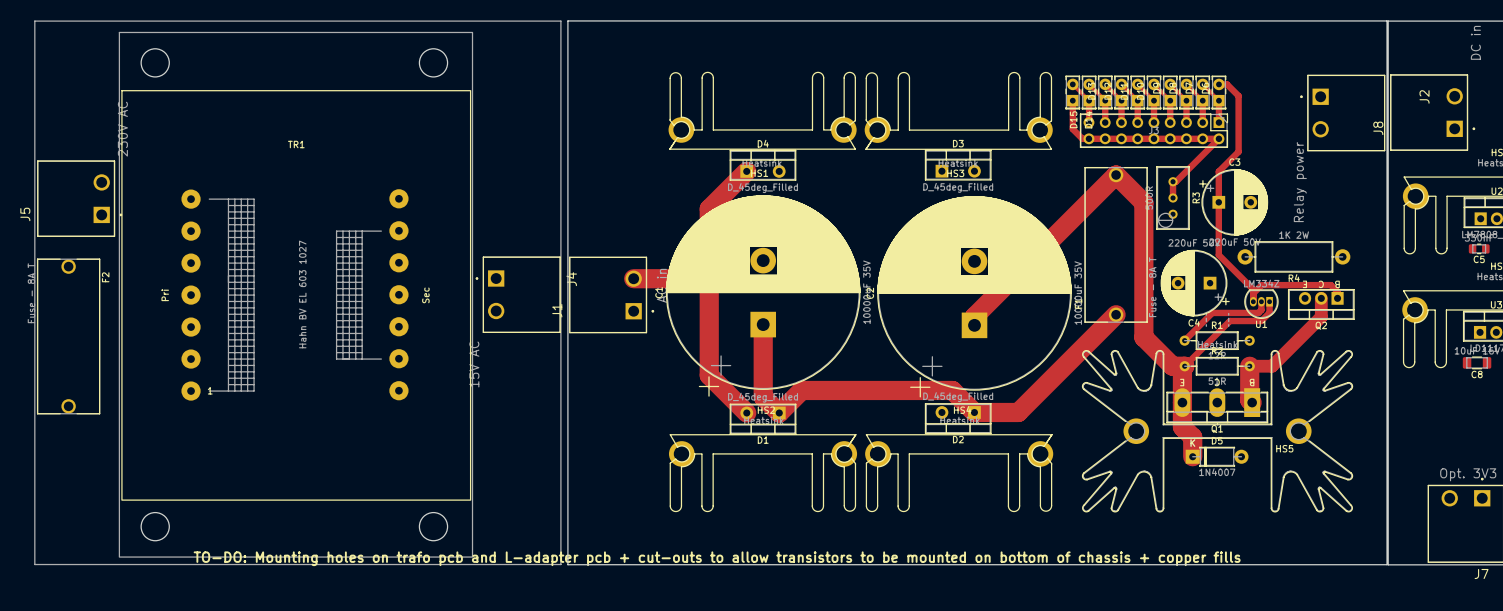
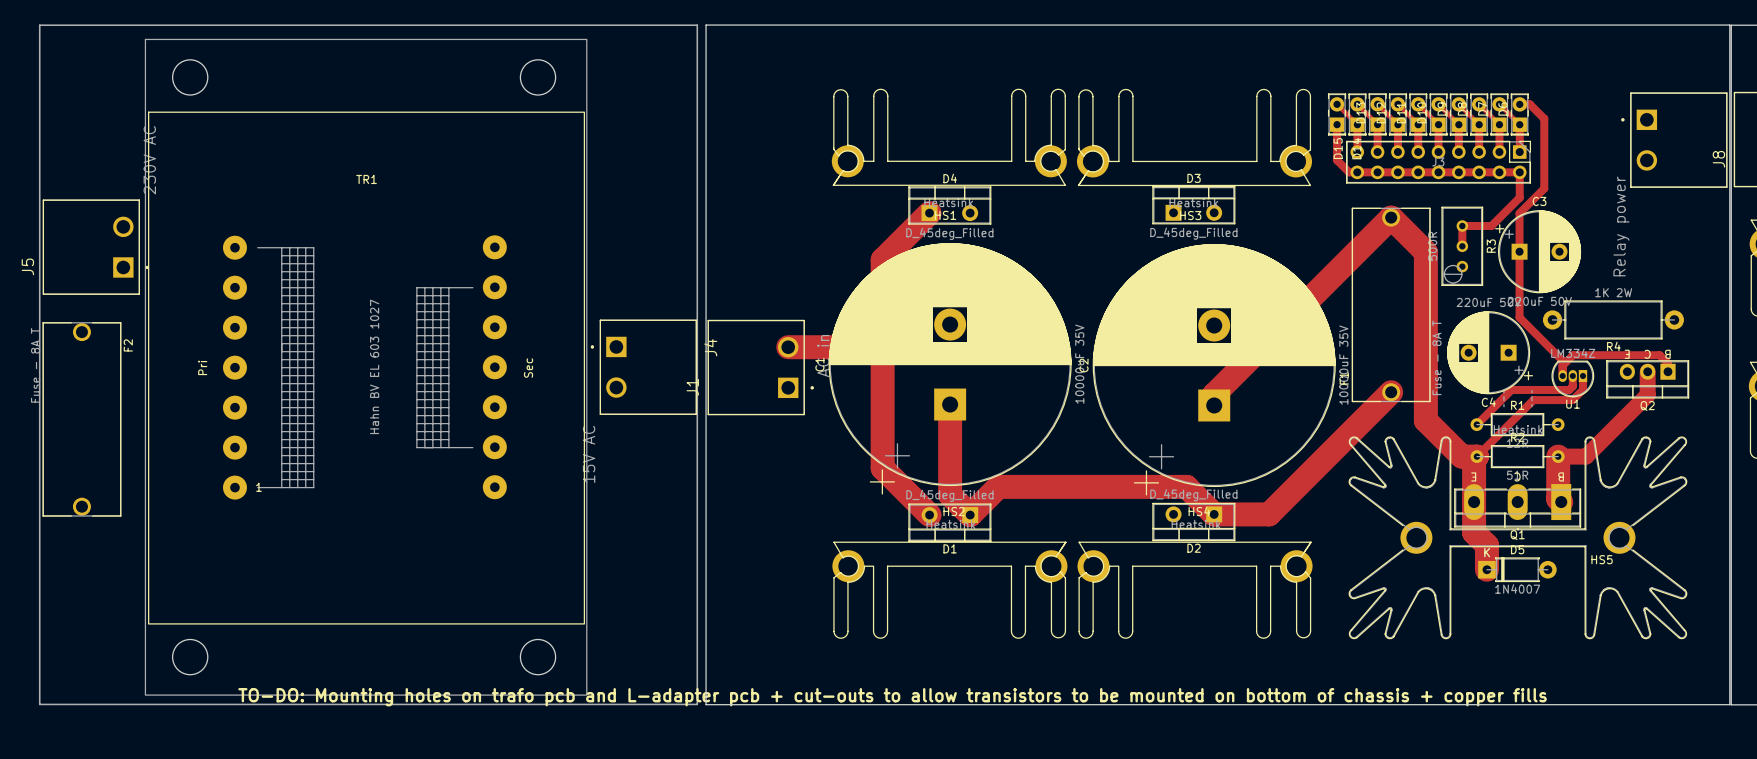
track: (1218, 138) (1176, 181) -> (1519, 172) (1519, 197) (1491, 226) (1466, 226)

